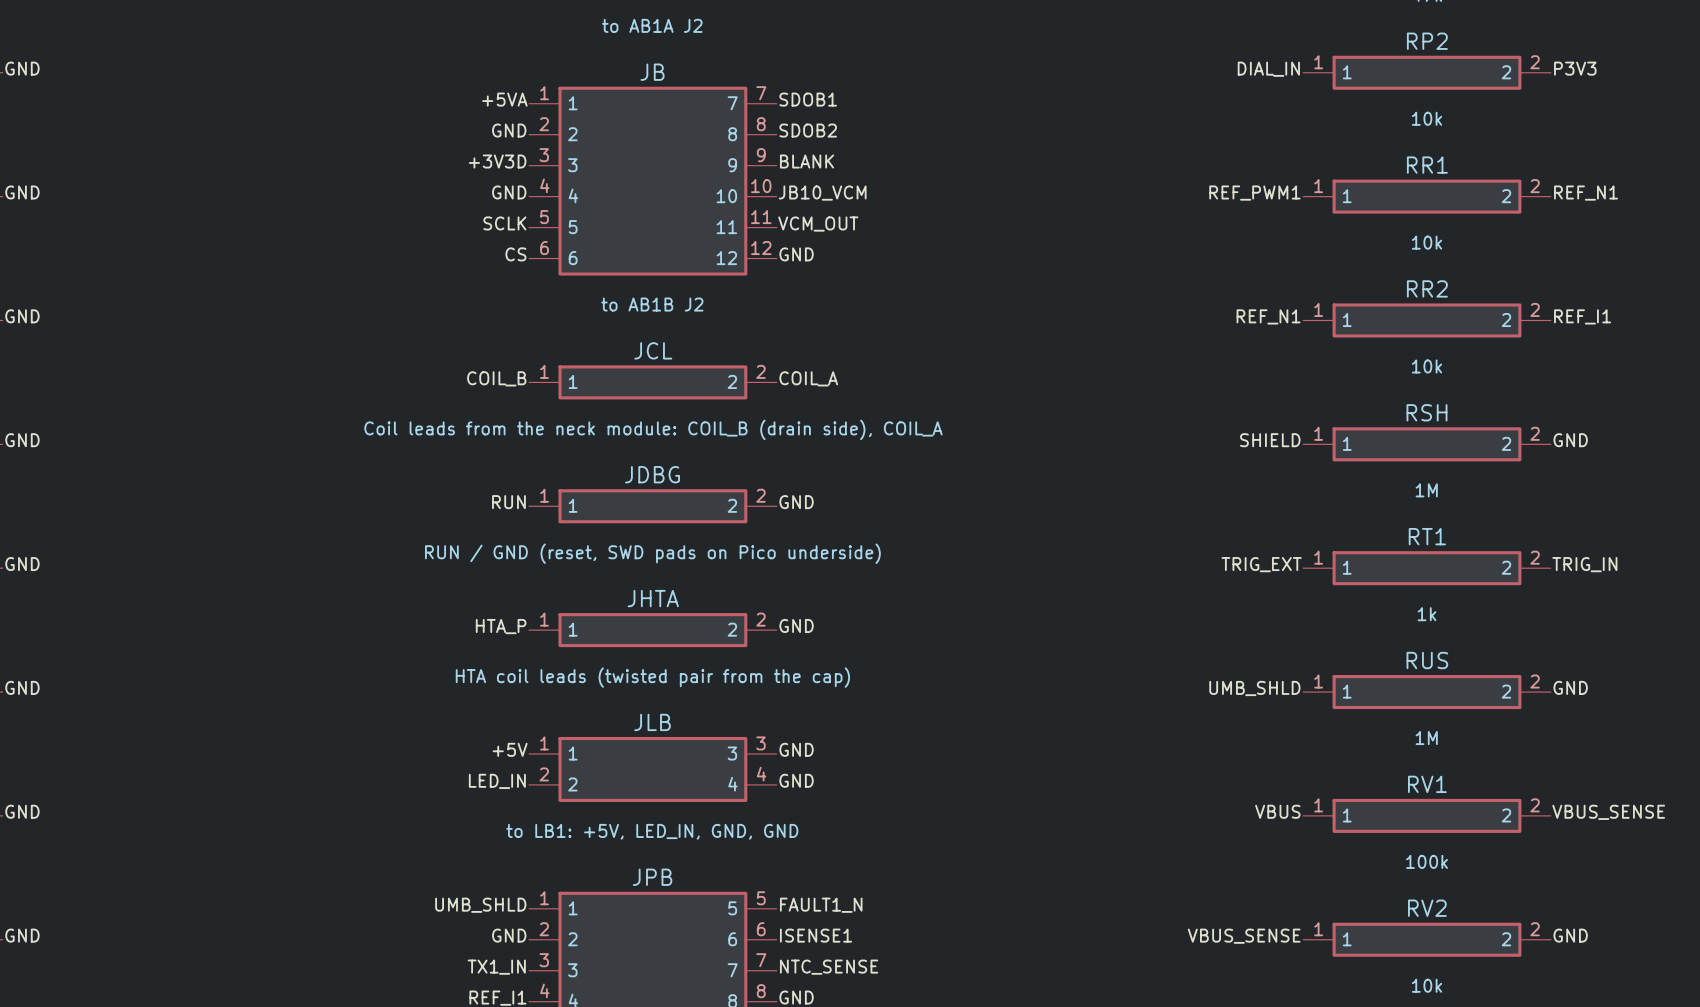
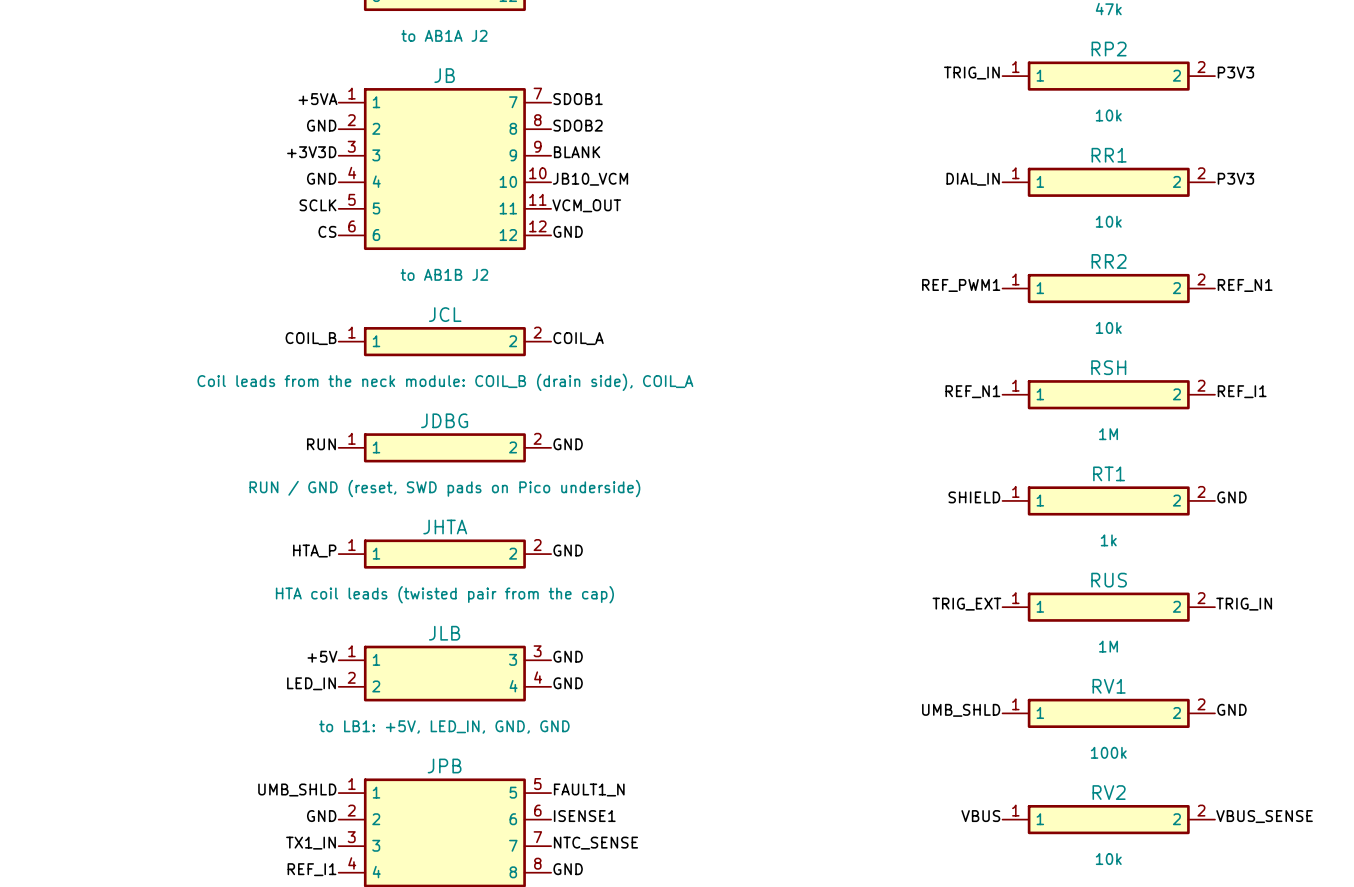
label: DIAL_IN (1268, 69) -> TRIG_IN (971, 73)
label: REF_PWM1 (1254, 193) -> DIAL_IN (973, 179)
label: REF_N1 (1586, 193) -> P3V3 (1235, 178)
label: REF_N1 (1268, 316) -> REF_PWM1 (961, 285)
label: REF_I1 (1582, 316) -> REF_N1 (1245, 285)
label: SHIELD (1270, 440) -> REF_N1 (972, 391)
label: GND (1570, 440) -> REF_I1 (1242, 391)
label: TRIG_EXT (1261, 564) -> SHIELD (974, 497)
label: TRIG_IN (1584, 564) -> GND (1231, 497)
label: GND (1570, 687) -> TRIG_IN (1244, 604)
label: UMB_SHLD (1254, 688) -> TRIG_EXT (966, 604)
label: VBUS (1277, 811) -> UMB_SHLD (961, 710)
label: VBUS_SENSE (1608, 812) -> GND (1231, 709)
label: GND (1570, 935) -> VBUS_SENSE (1264, 816)
label: VBUS_SENSE (1244, 936) -> VBUS (980, 816)

